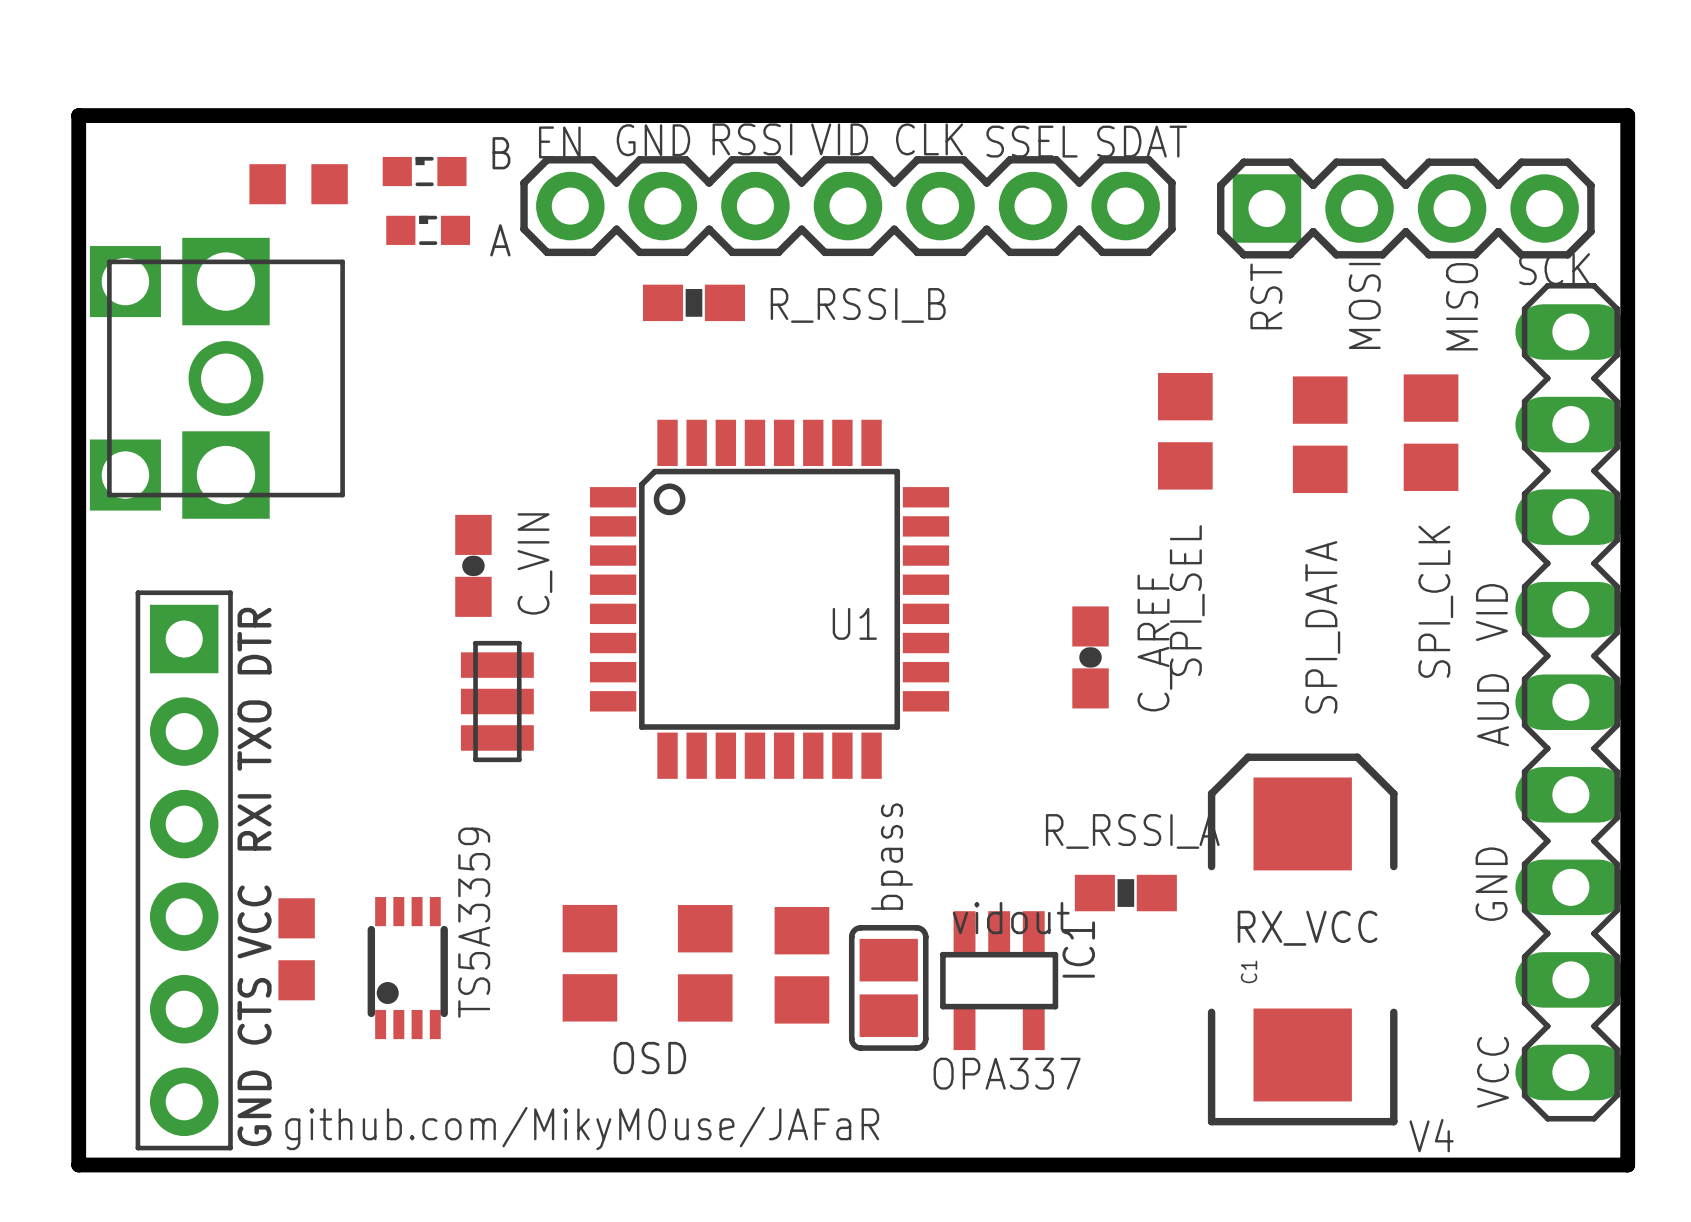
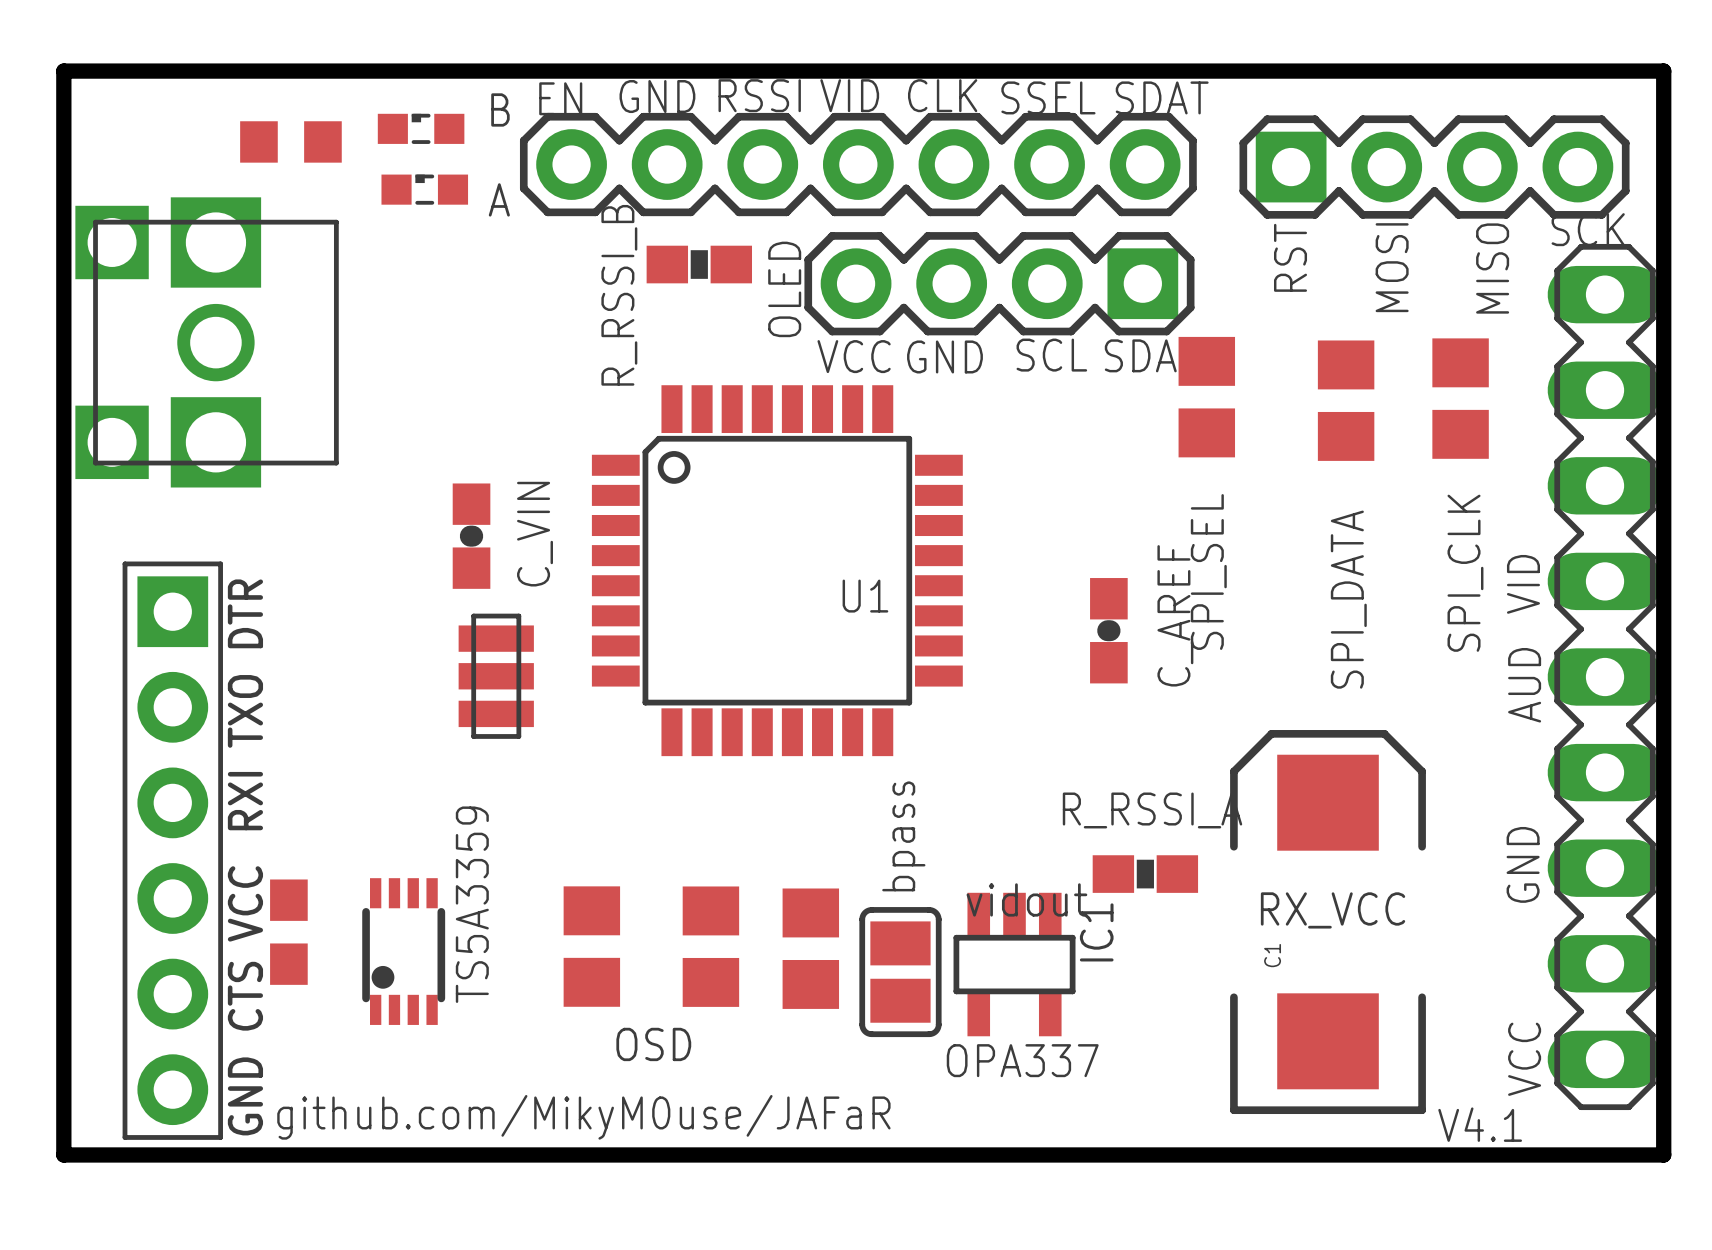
R_RSSI_B name rotation: 0° (858, 305) -> 90° counterclockwise (619, 295)
R_RSSI_B name position: R_RSSI_B (858, 305) -> R_RSSI_B (619, 295)
part: none -> (999, 283)
text: none -> OLED (784, 289)
text: none -> SCL (1051, 355)
text: none -> SDA (1140, 355)
text: none -> VCC (854, 356)
text: none -> GND (944, 356)
text: V4 (1431, 1135) -> V4.1 (1480, 1124)

